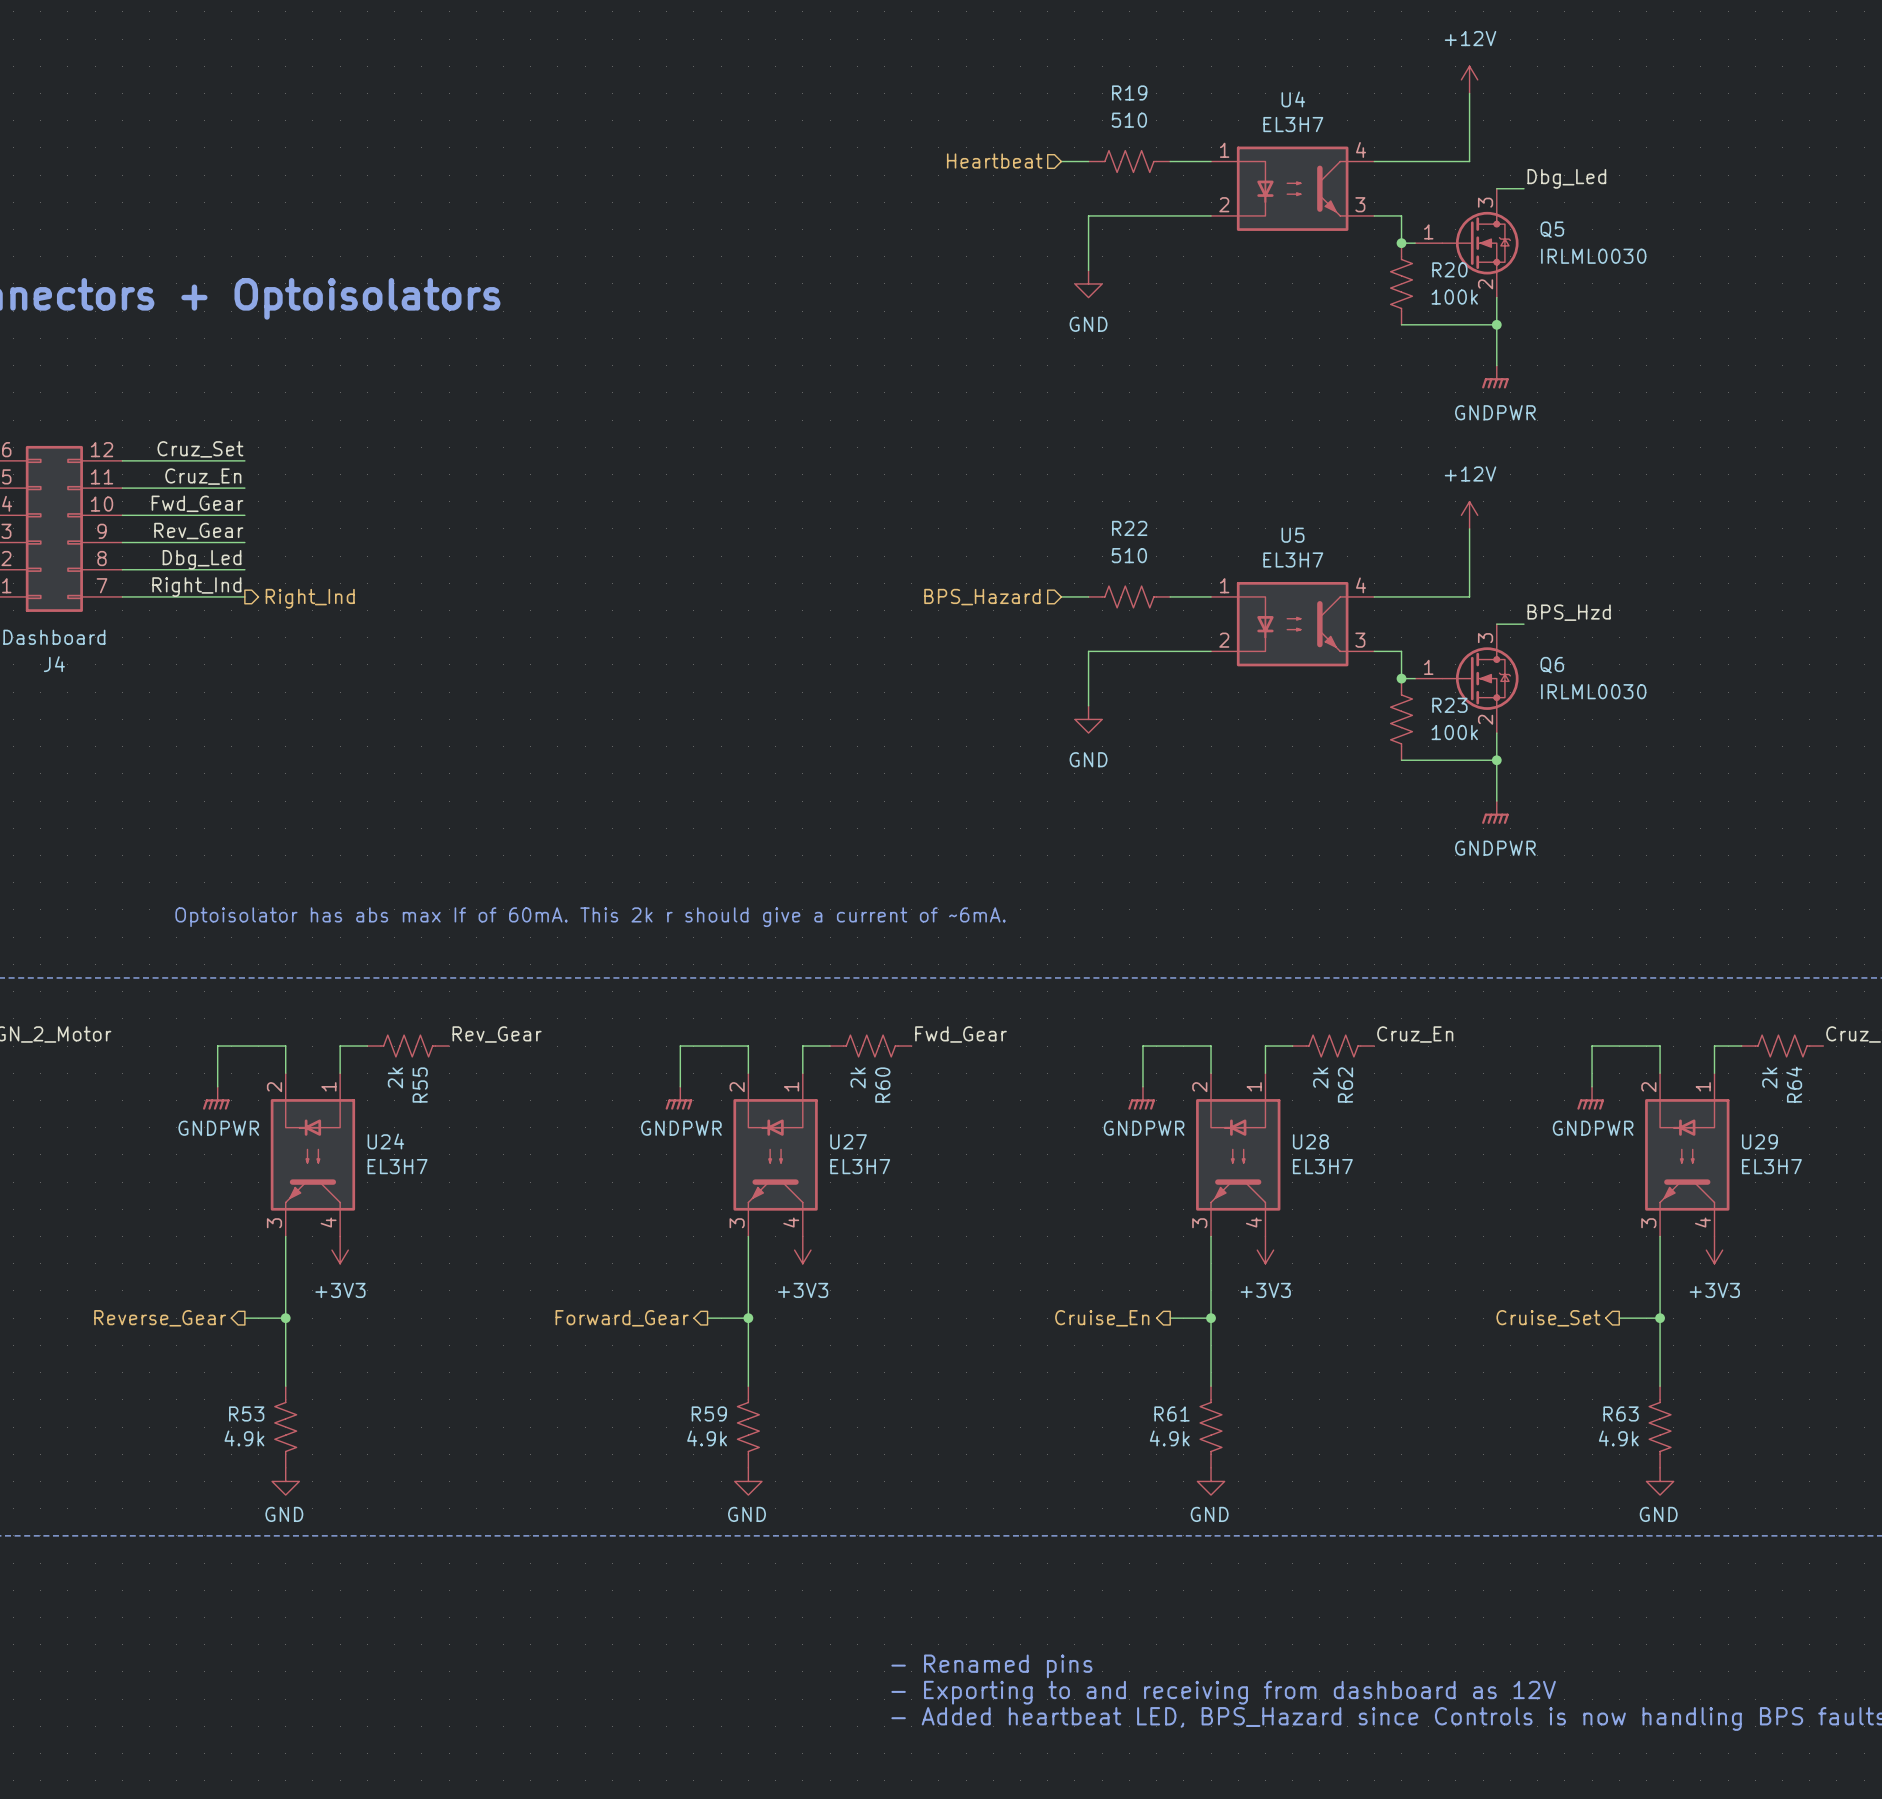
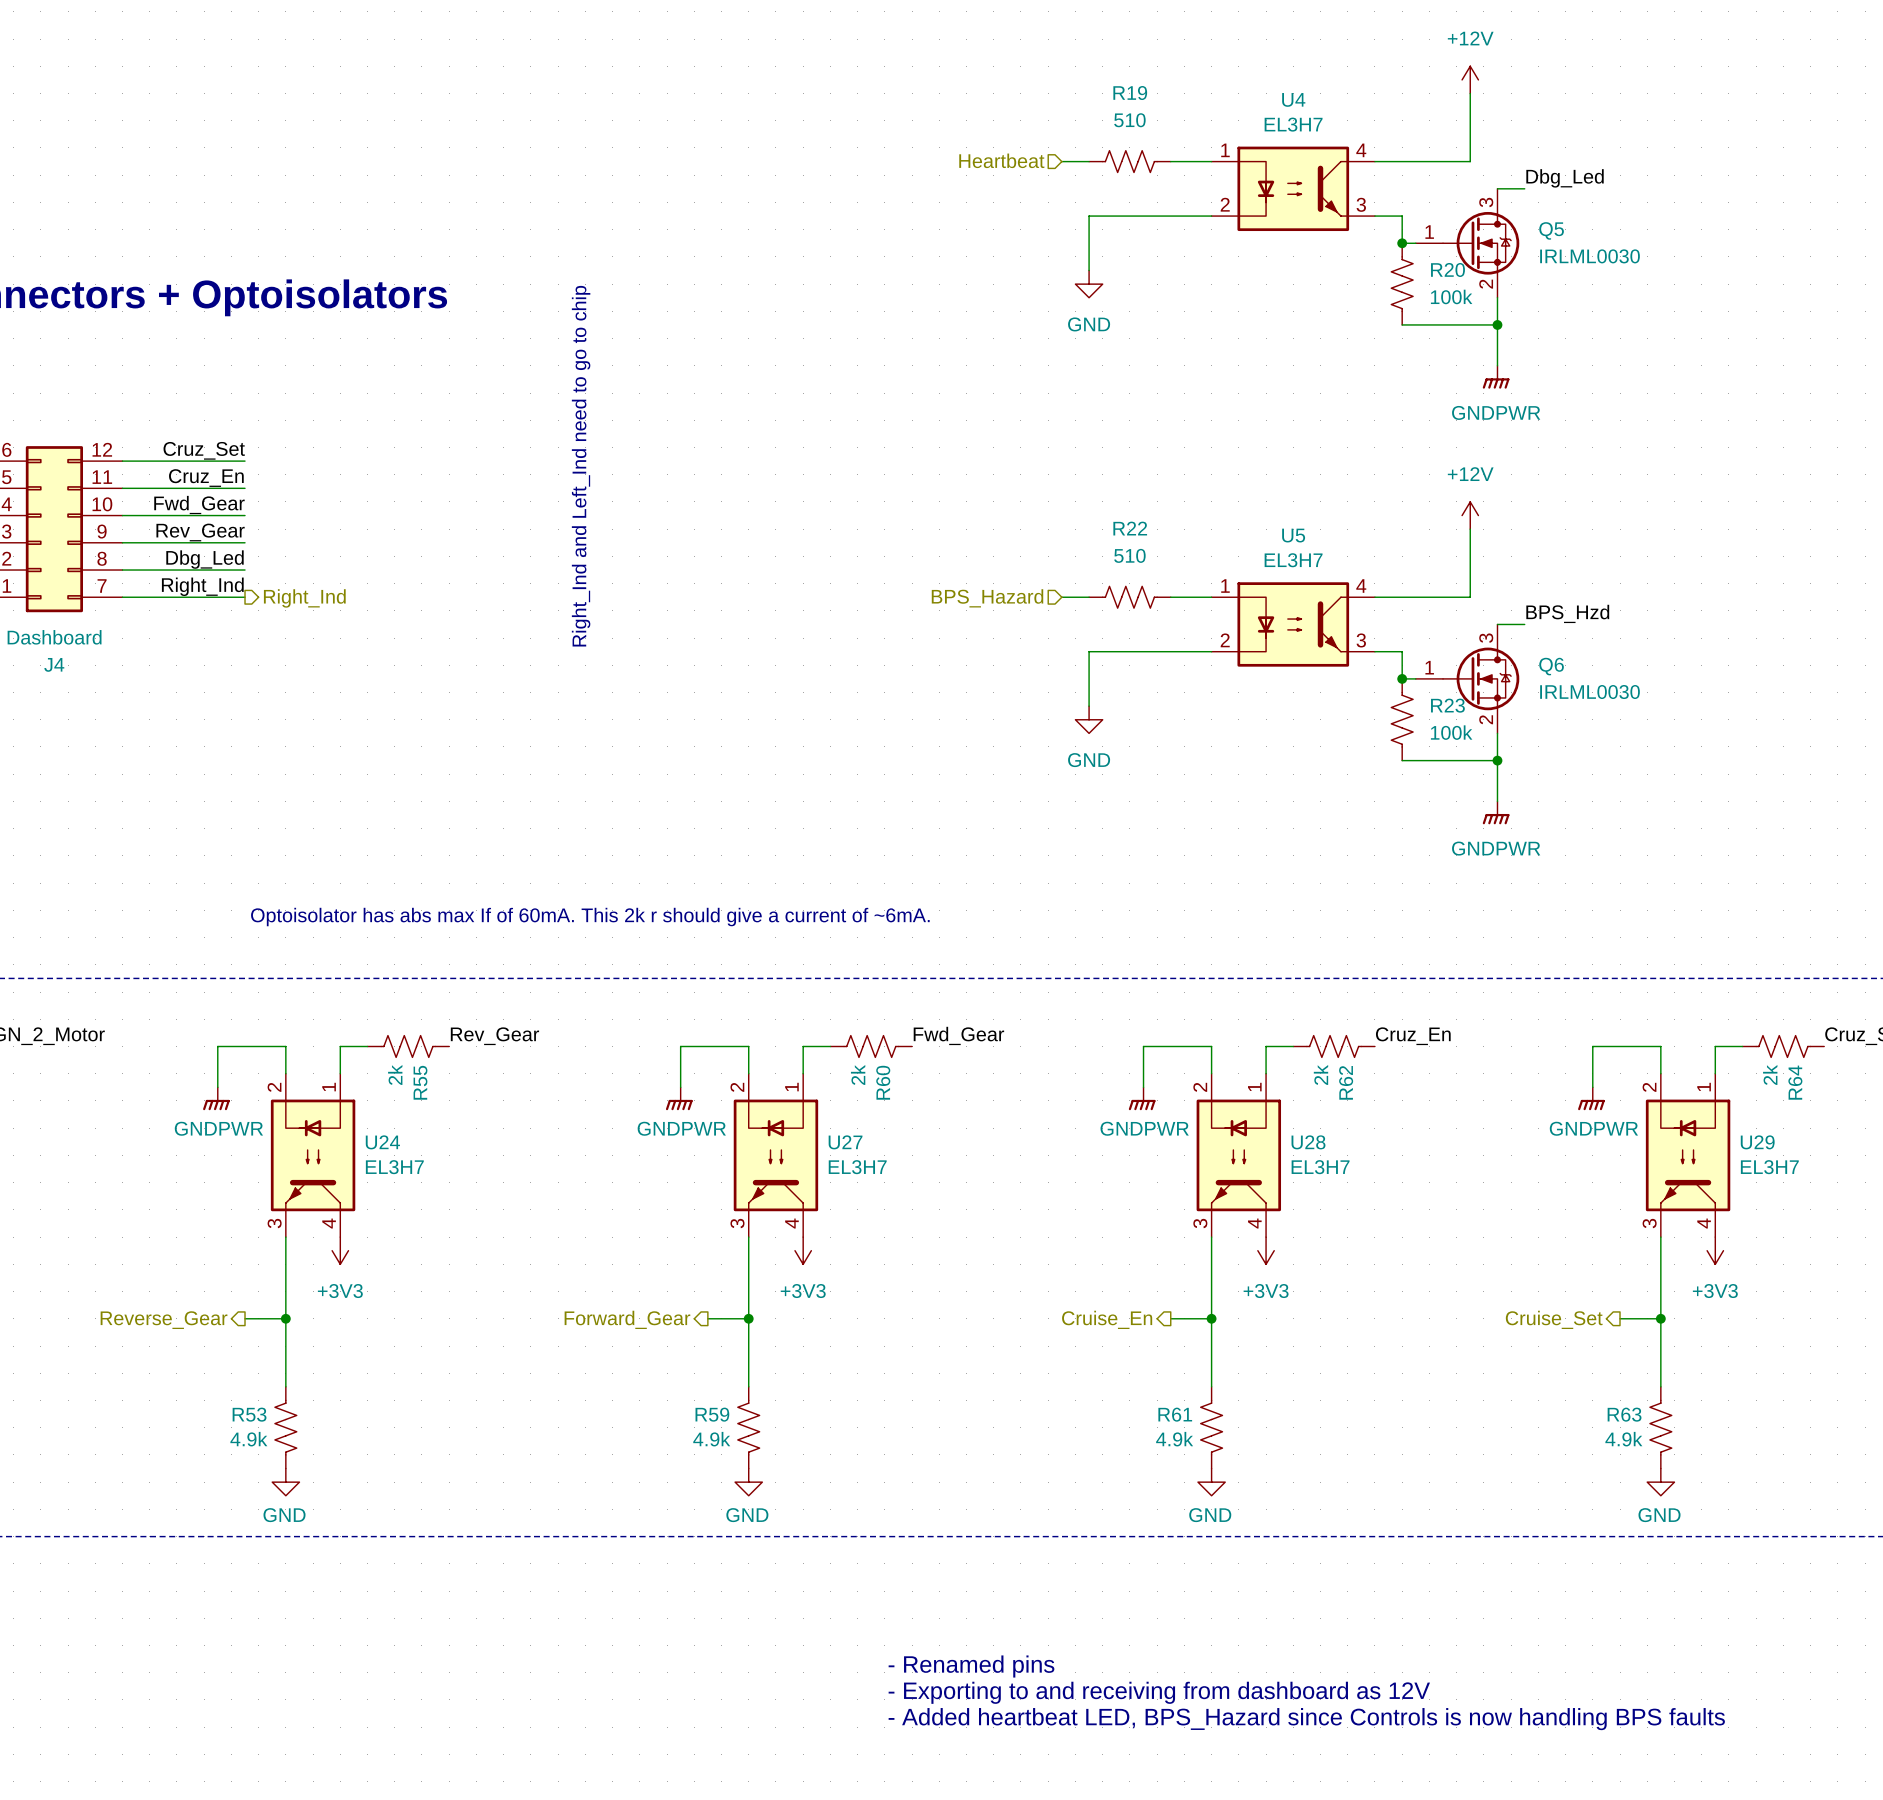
text: none -> Right_Ind and Left_Ind need to go to chip (581, 466)

